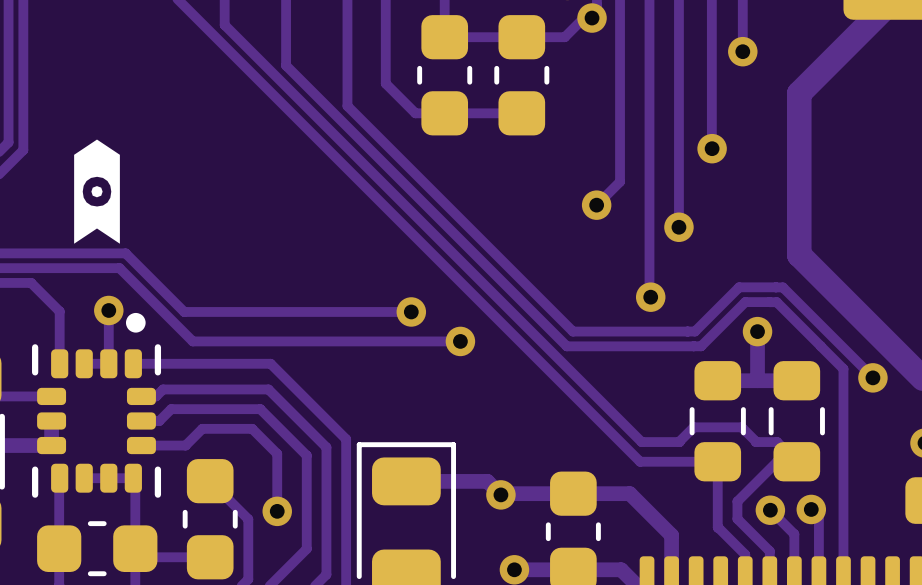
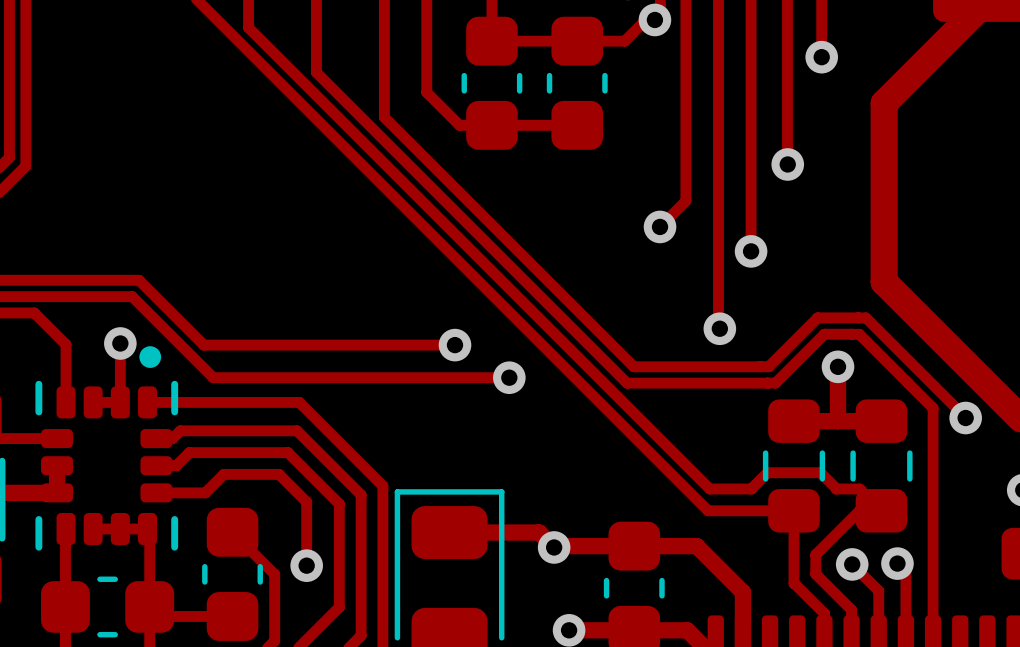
drawing: [74, 139, 120, 244] -> none

